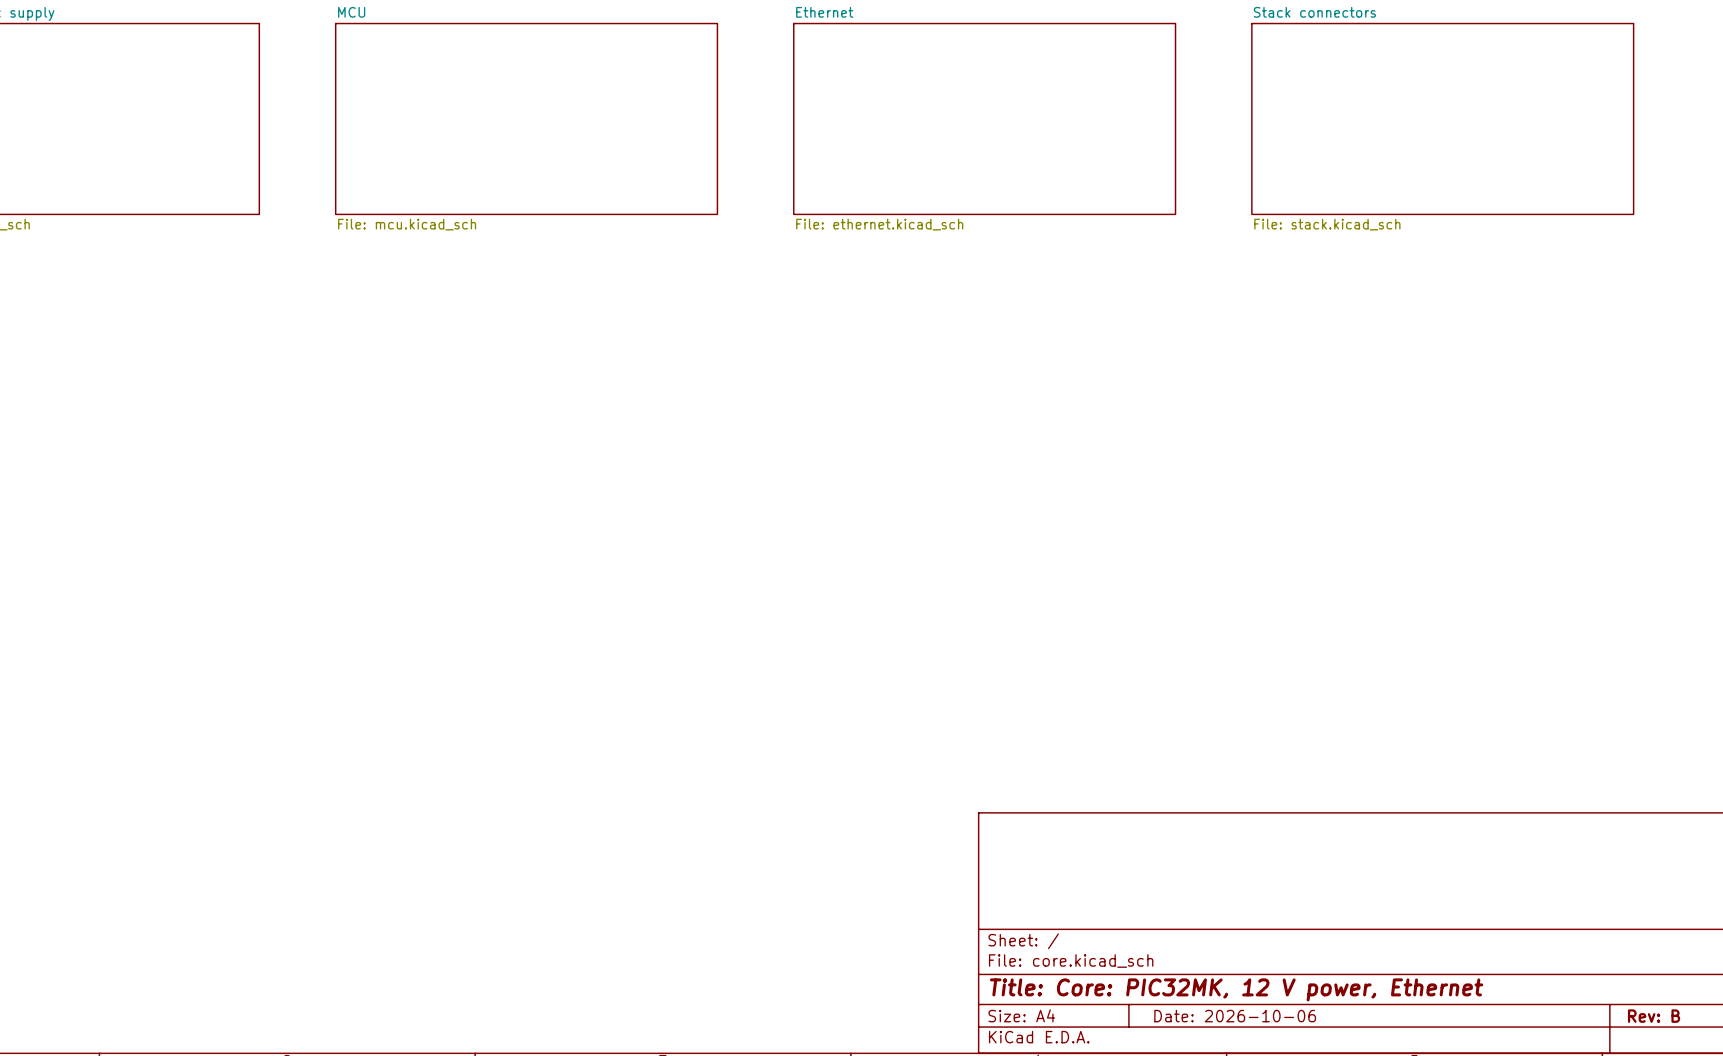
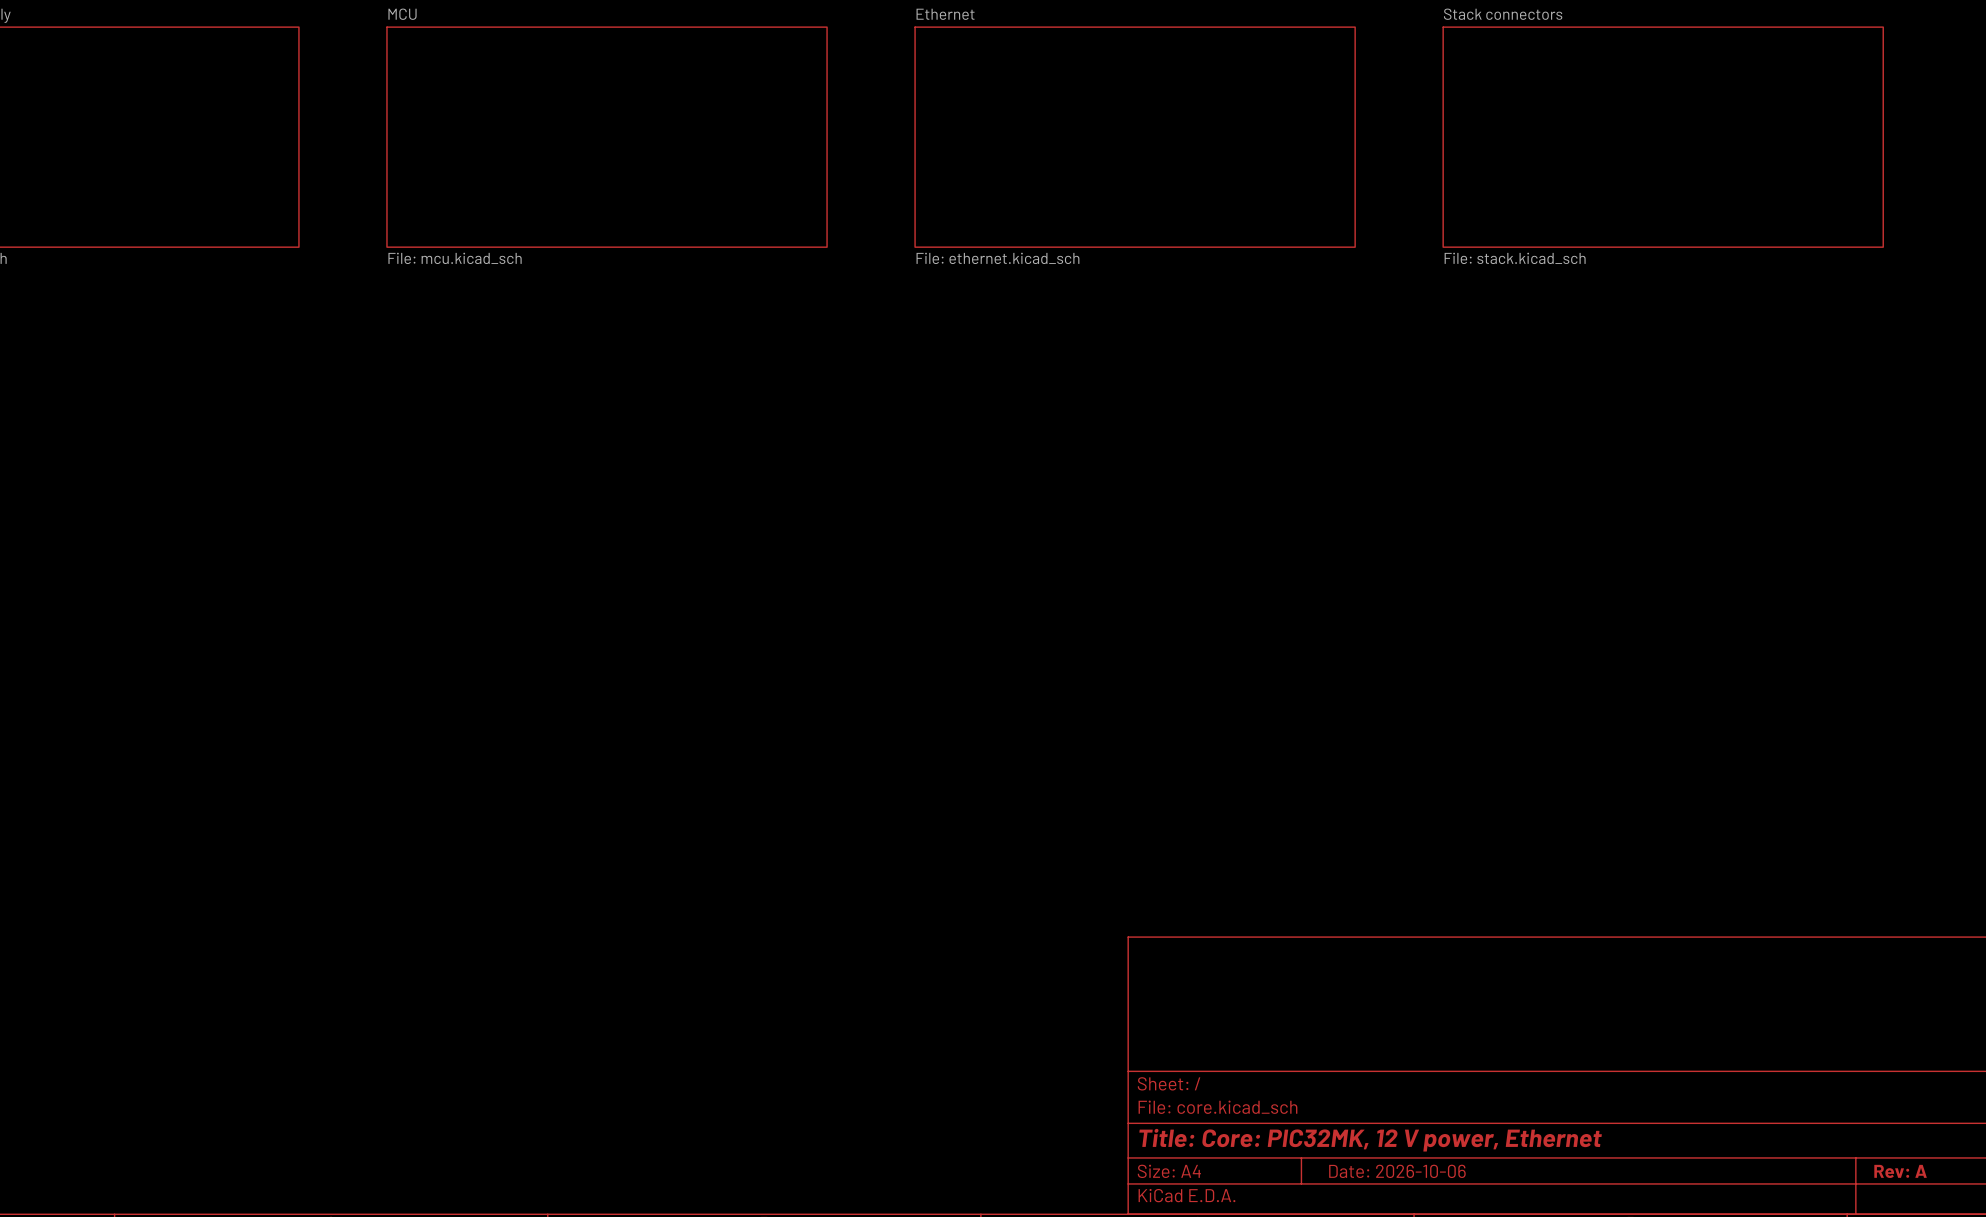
title block: Rev: B (1654, 1016) -> Rev: A (1900, 1171)

